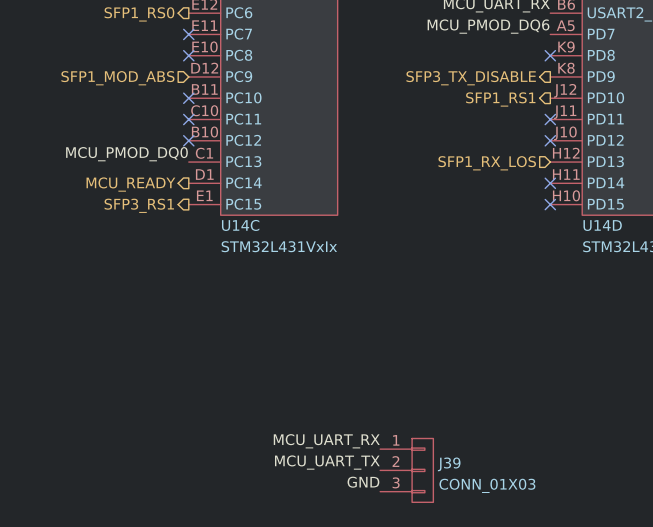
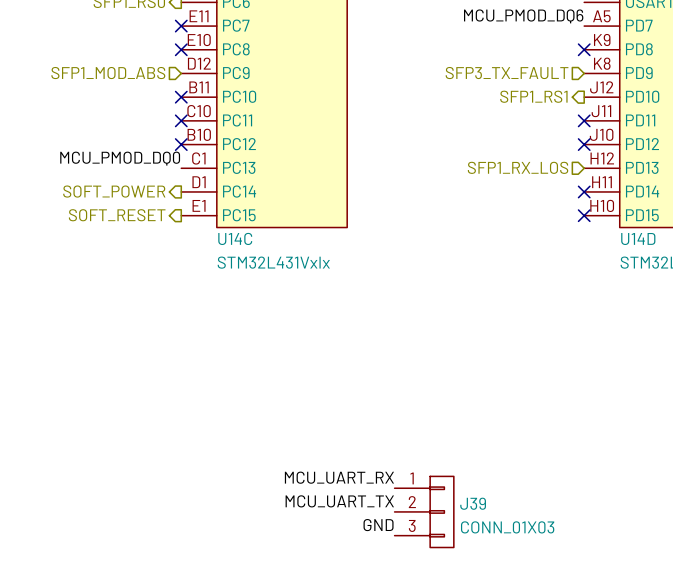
hierarchical label shape: output (471, 78) -> input (507, 73)
hierarchical label: SFP3_TX_DISABLE (471, 78) -> SFP3_TX_FAULT (507, 73)
hierarchical label: MCU_READY (130, 184) -> SOFT_POWER (114, 191)
hierarchical label: SFP3_RS1 (139, 205) -> SOFT_RESET (117, 215)

